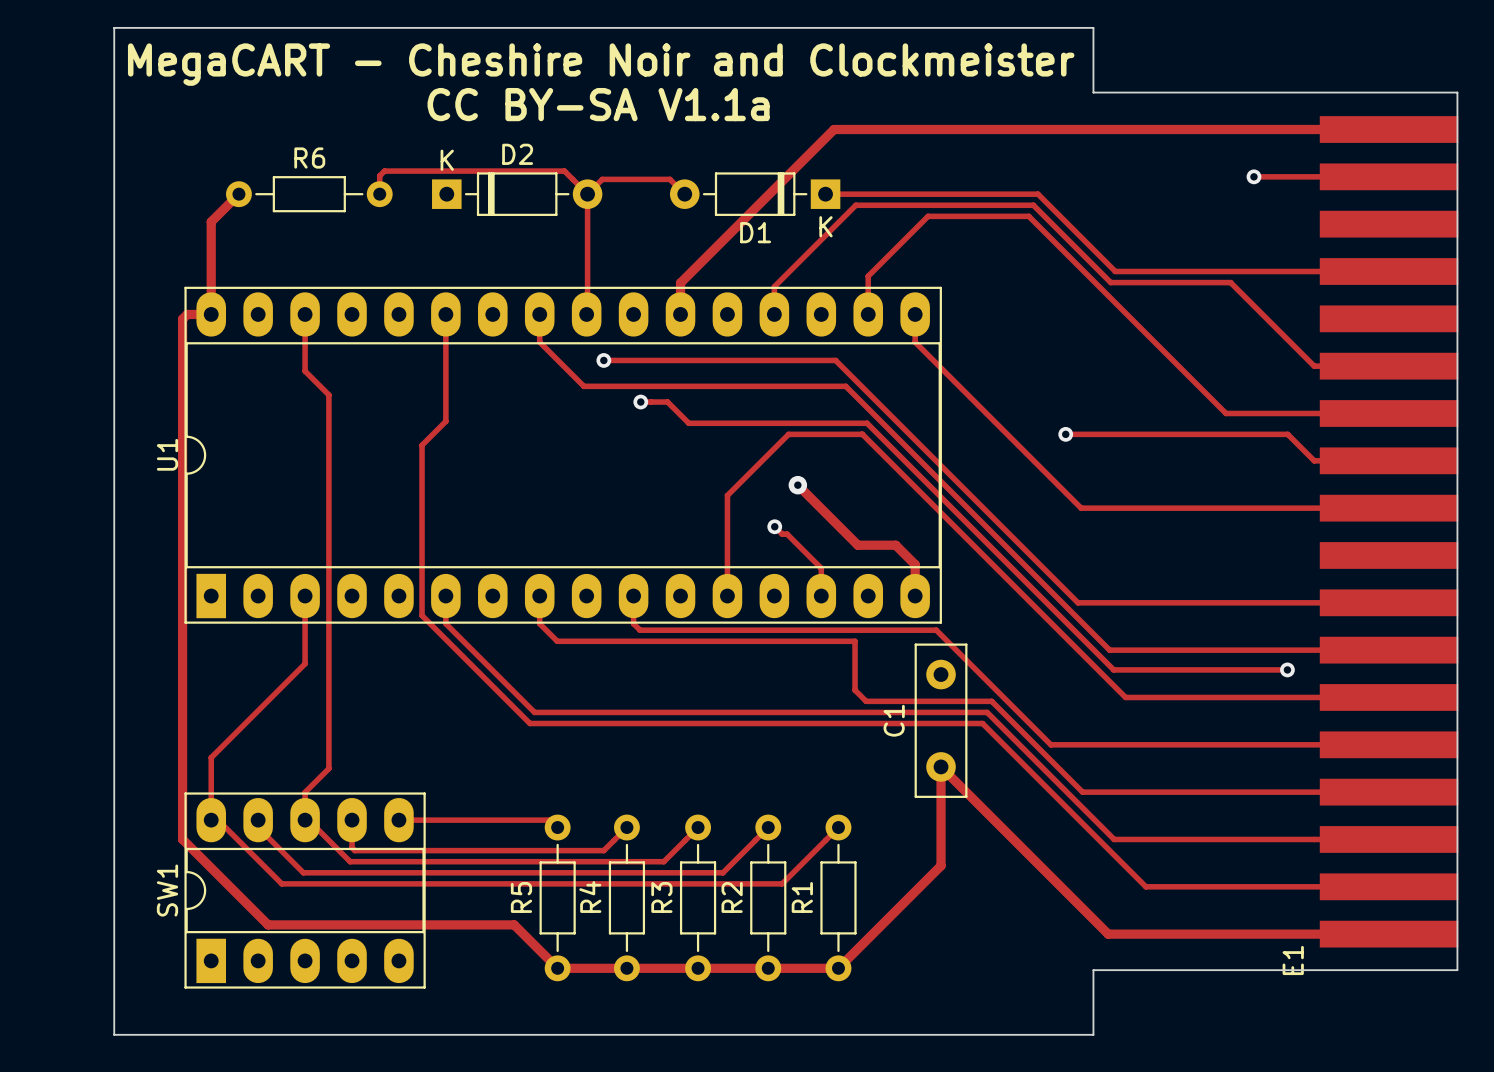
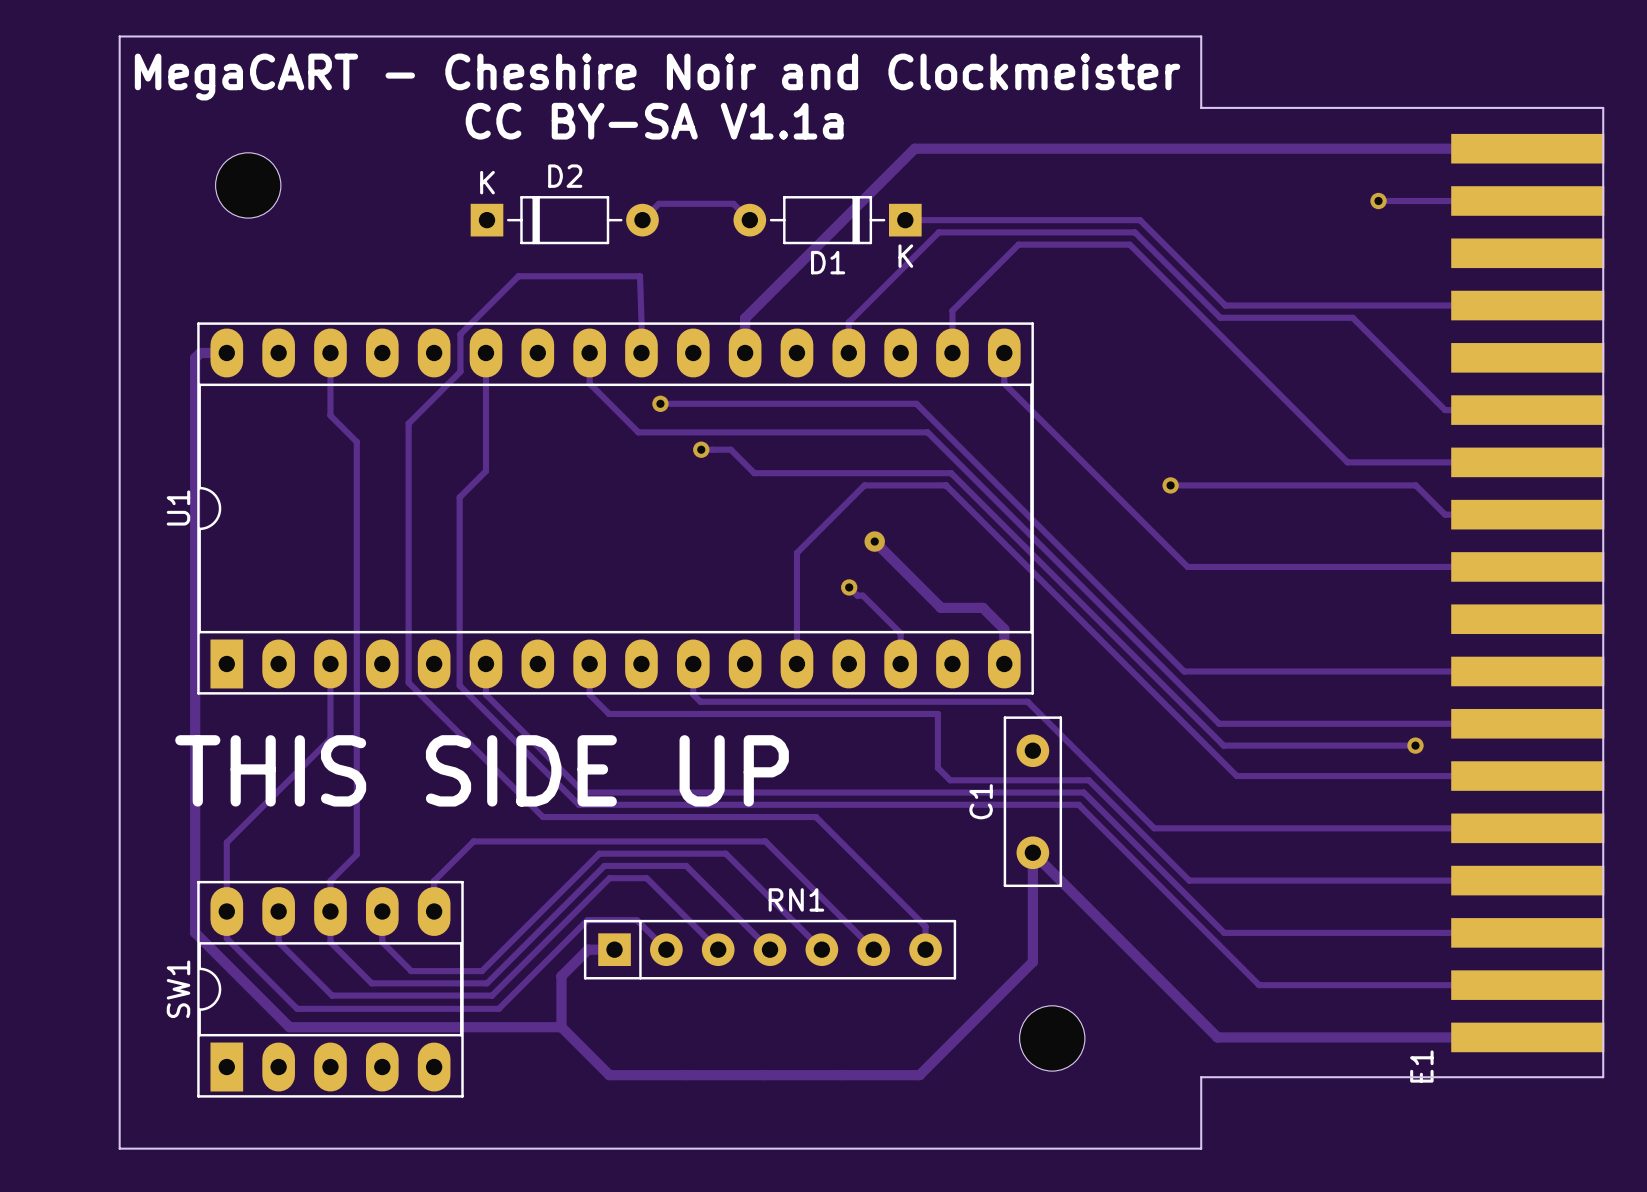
part: none -> (248, 185)
track: (238, 194) (211, 221) (211, 314) -> none
R6: (309, 194) -> none
track: (379, 194) (379, 175) (384, 171) (564, 171) (587, 194) (587, 313) -> (925, 949) (925, 926) (815, 817) (542, 817) (408, 682) (408, 423) (460, 371) (460, 334) (518, 276) (640, 276) (642, 351)
text: none -> THIS SIDE UP (482, 770)
track: (211, 813) (281, 883) (782, 883) (838, 827) -> none
track: none -> (226, 911) (226, 938) (297, 1008) (498, 1008) (587, 920) (636, 920) (666, 949)
track: (305, 820) (308, 820) (350, 861) (663, 861) (698, 827) -> (330, 911) (330, 942) (371, 983) (487, 983) (604, 865) (686, 865) (770, 949)
track: (398, 820) (550, 820) (557, 827) -> (434, 911) (434, 880) (473, 841) (765, 841) (873, 949)
track: (258, 827) (303, 872) (723, 872) (768, 827) -> (278, 919) (278, 942) (332, 995) (492, 995) (609, 878) (646, 878) (718, 949)
track: (626, 827) (603, 850) (354, 850) -> (821, 949) (725, 853) (599, 853) (481, 971) (411, 971) (385, 945)
track: none -> (614, 949) (588, 949) (561, 976) (561, 1027)
RN1: none -> (770, 949)
R5: (557, 897) -> none
R4: (626, 897) -> none
R3: (698, 897) -> none
R2: (768, 897) -> none
R1: (838, 897) -> none
part: none -> (1052, 1038)

